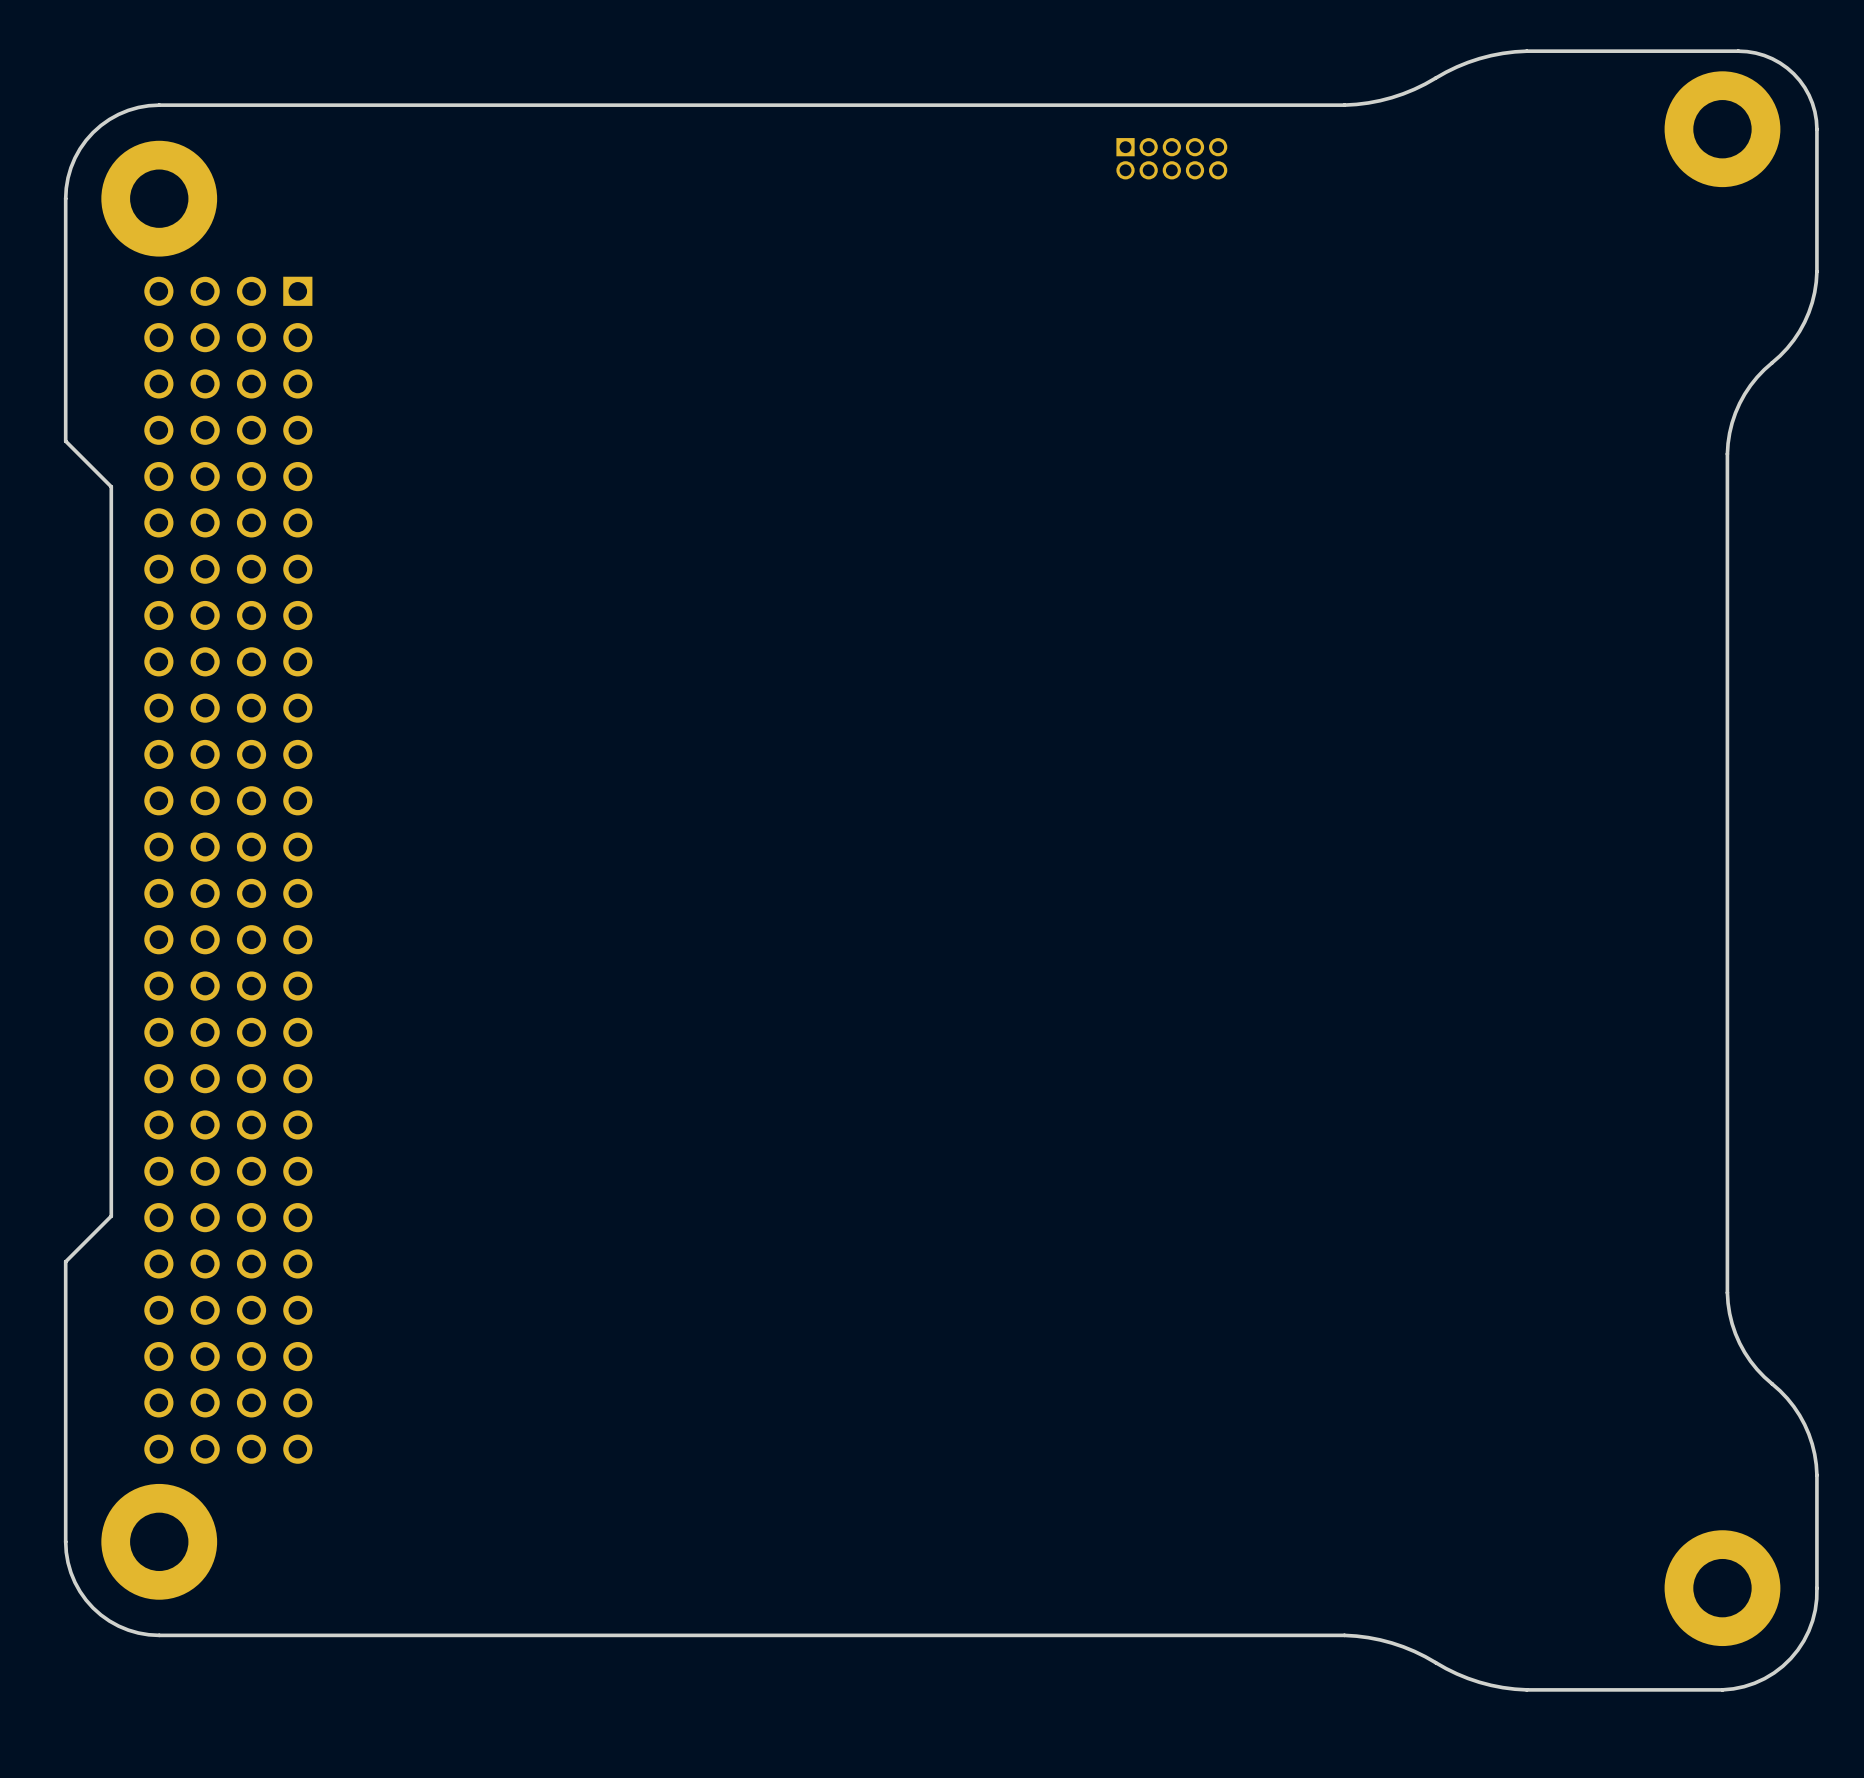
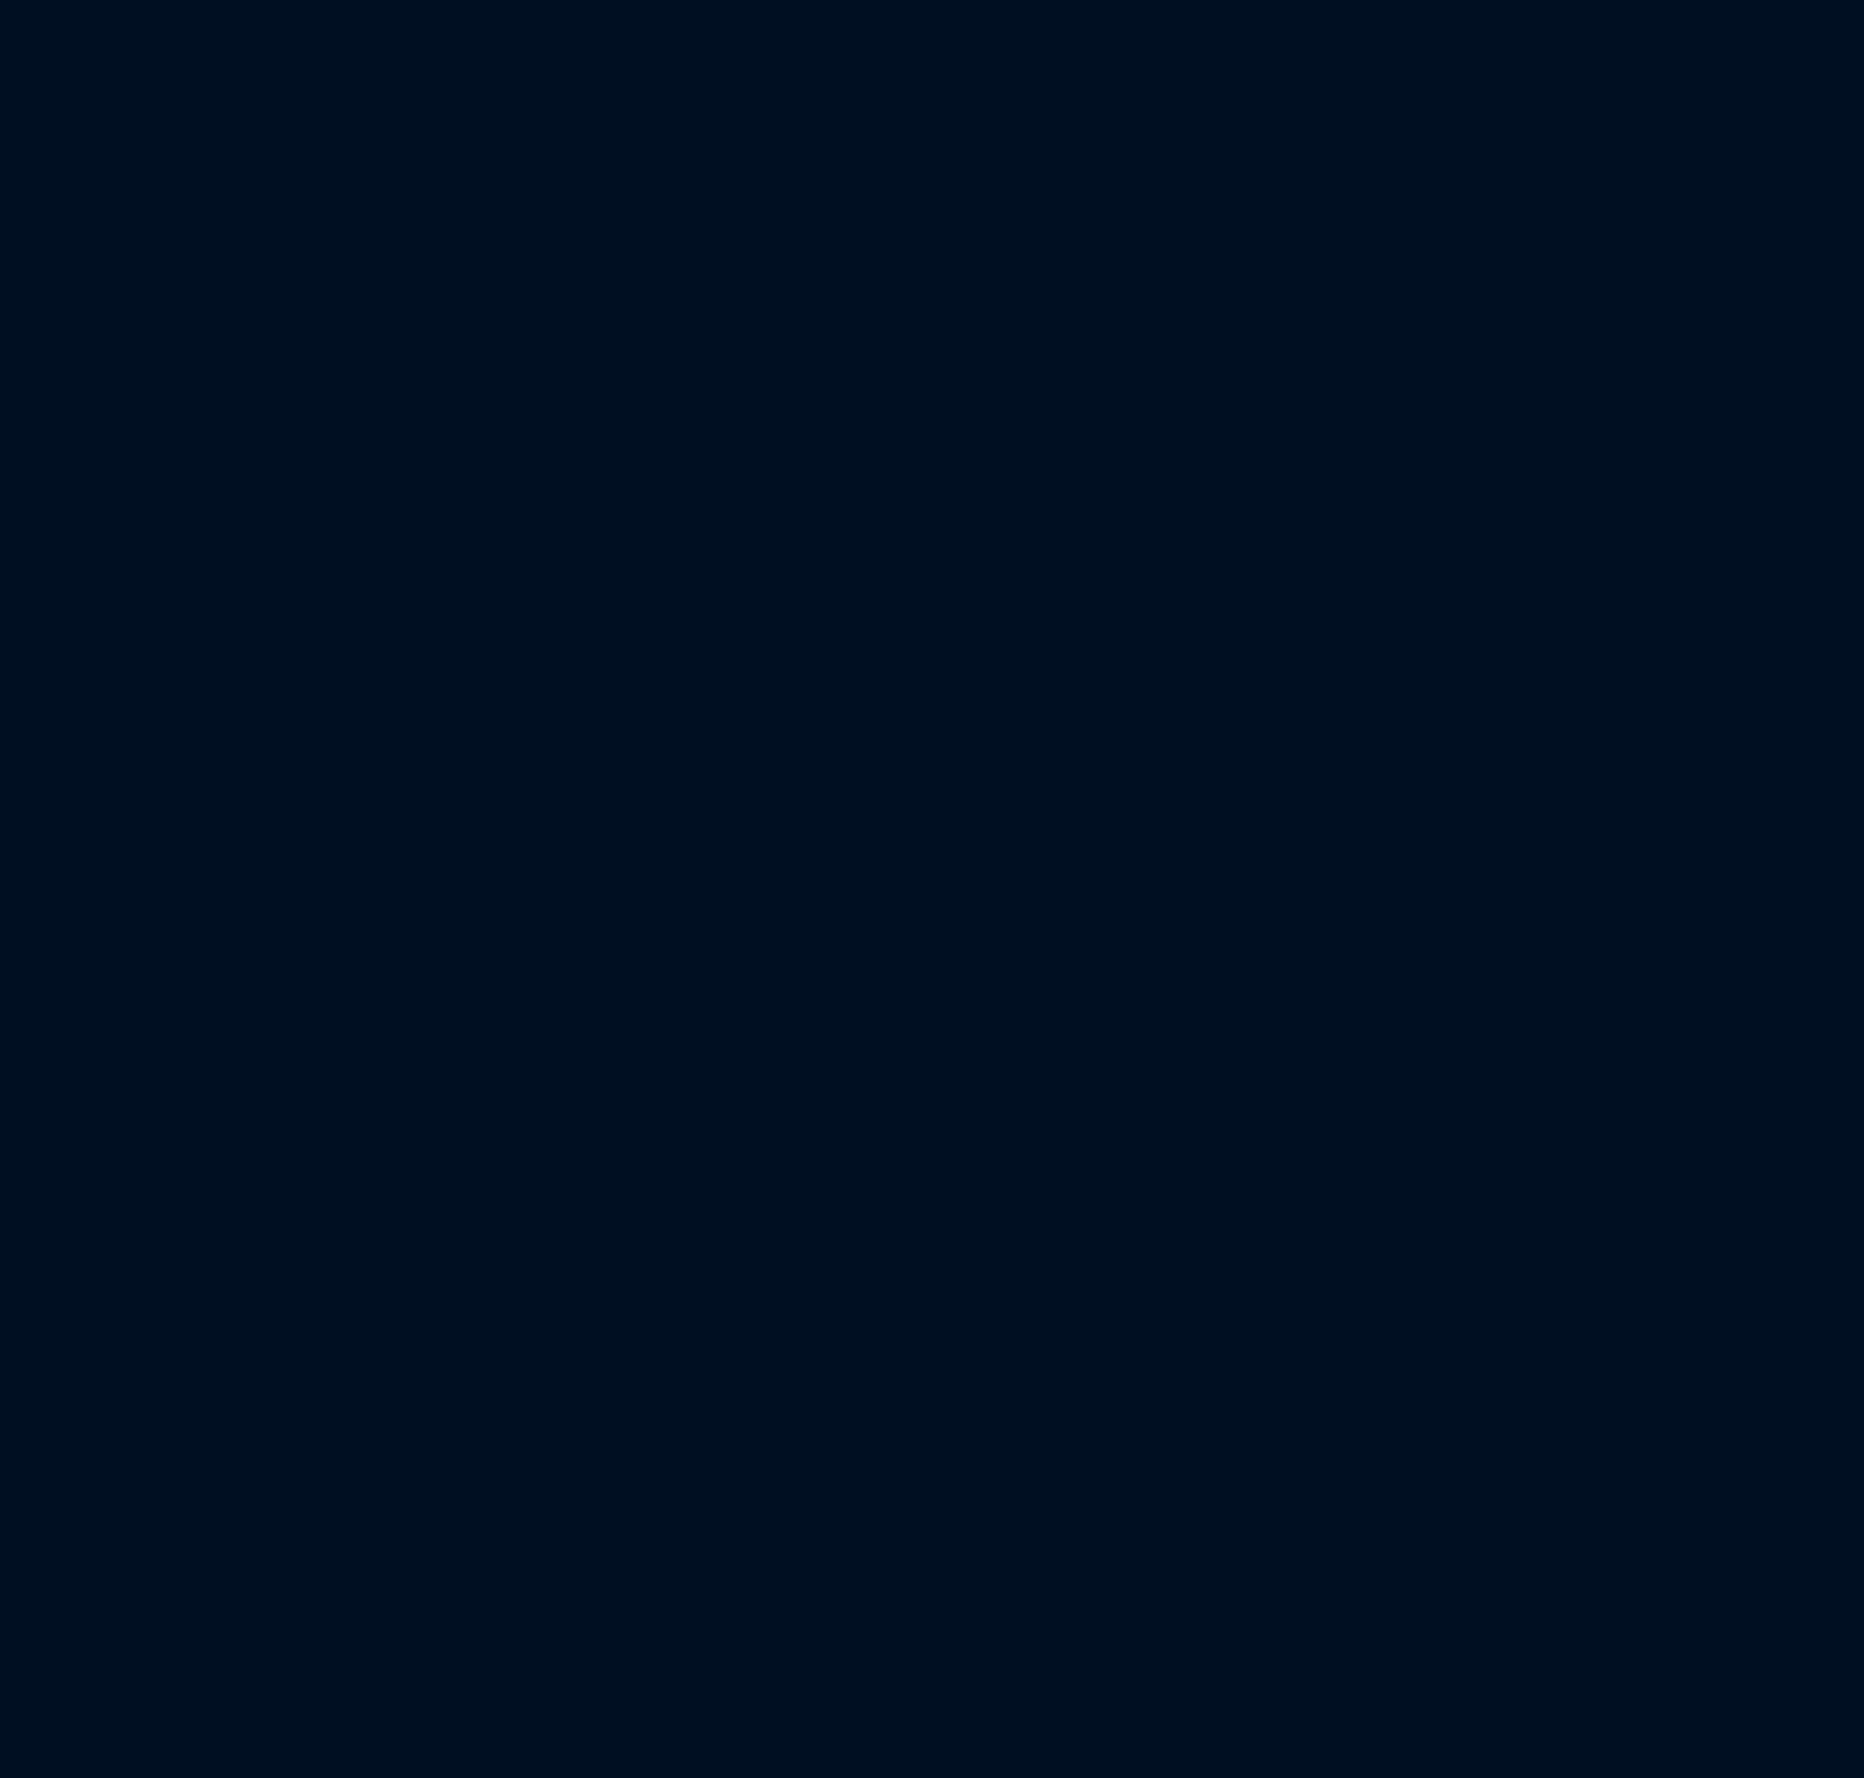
part: (1171, 158) -> none
part: (941, 870) -> none

